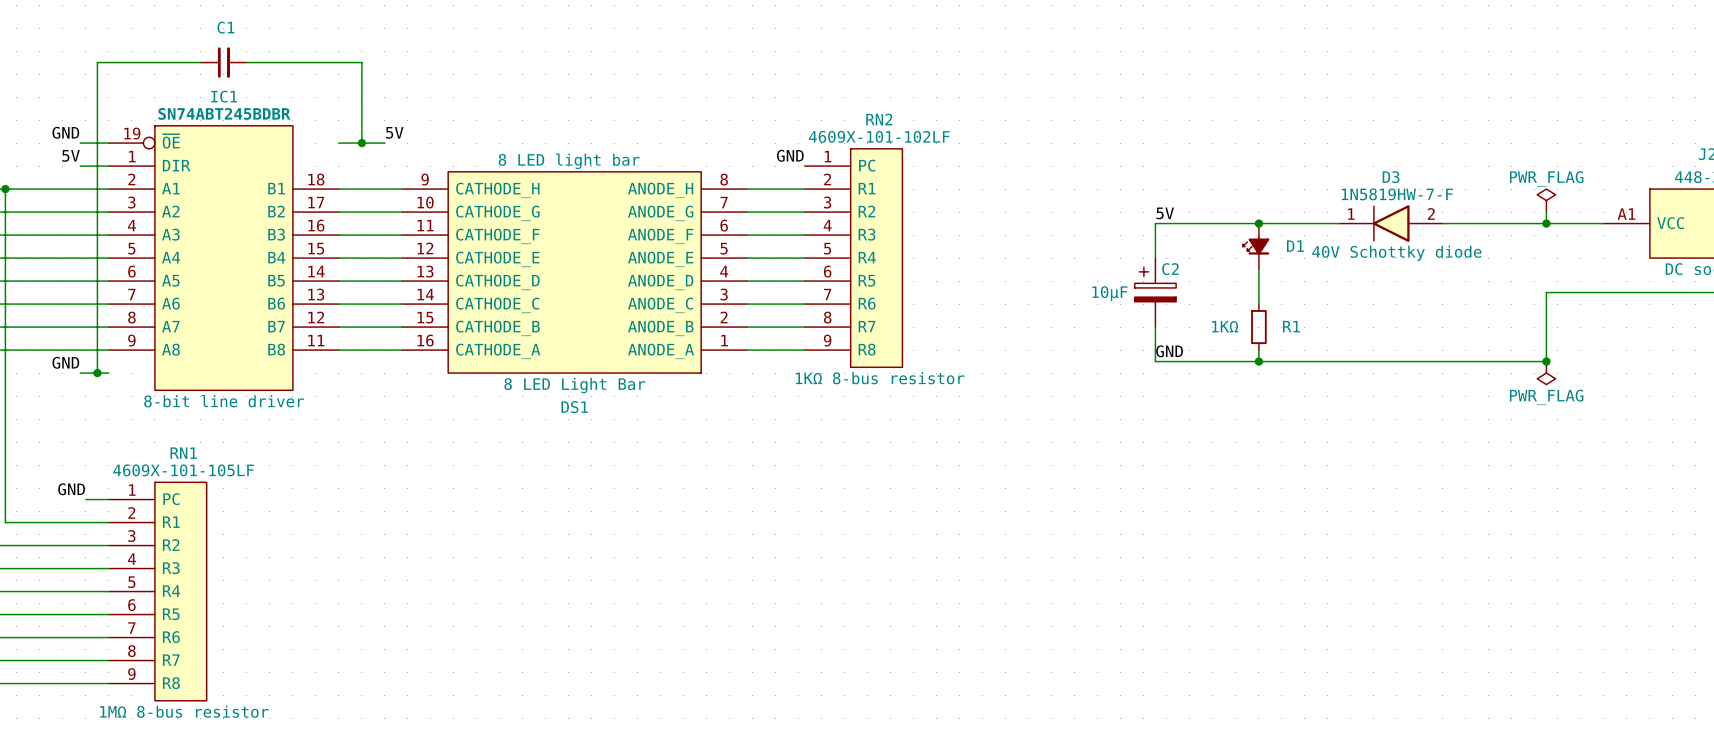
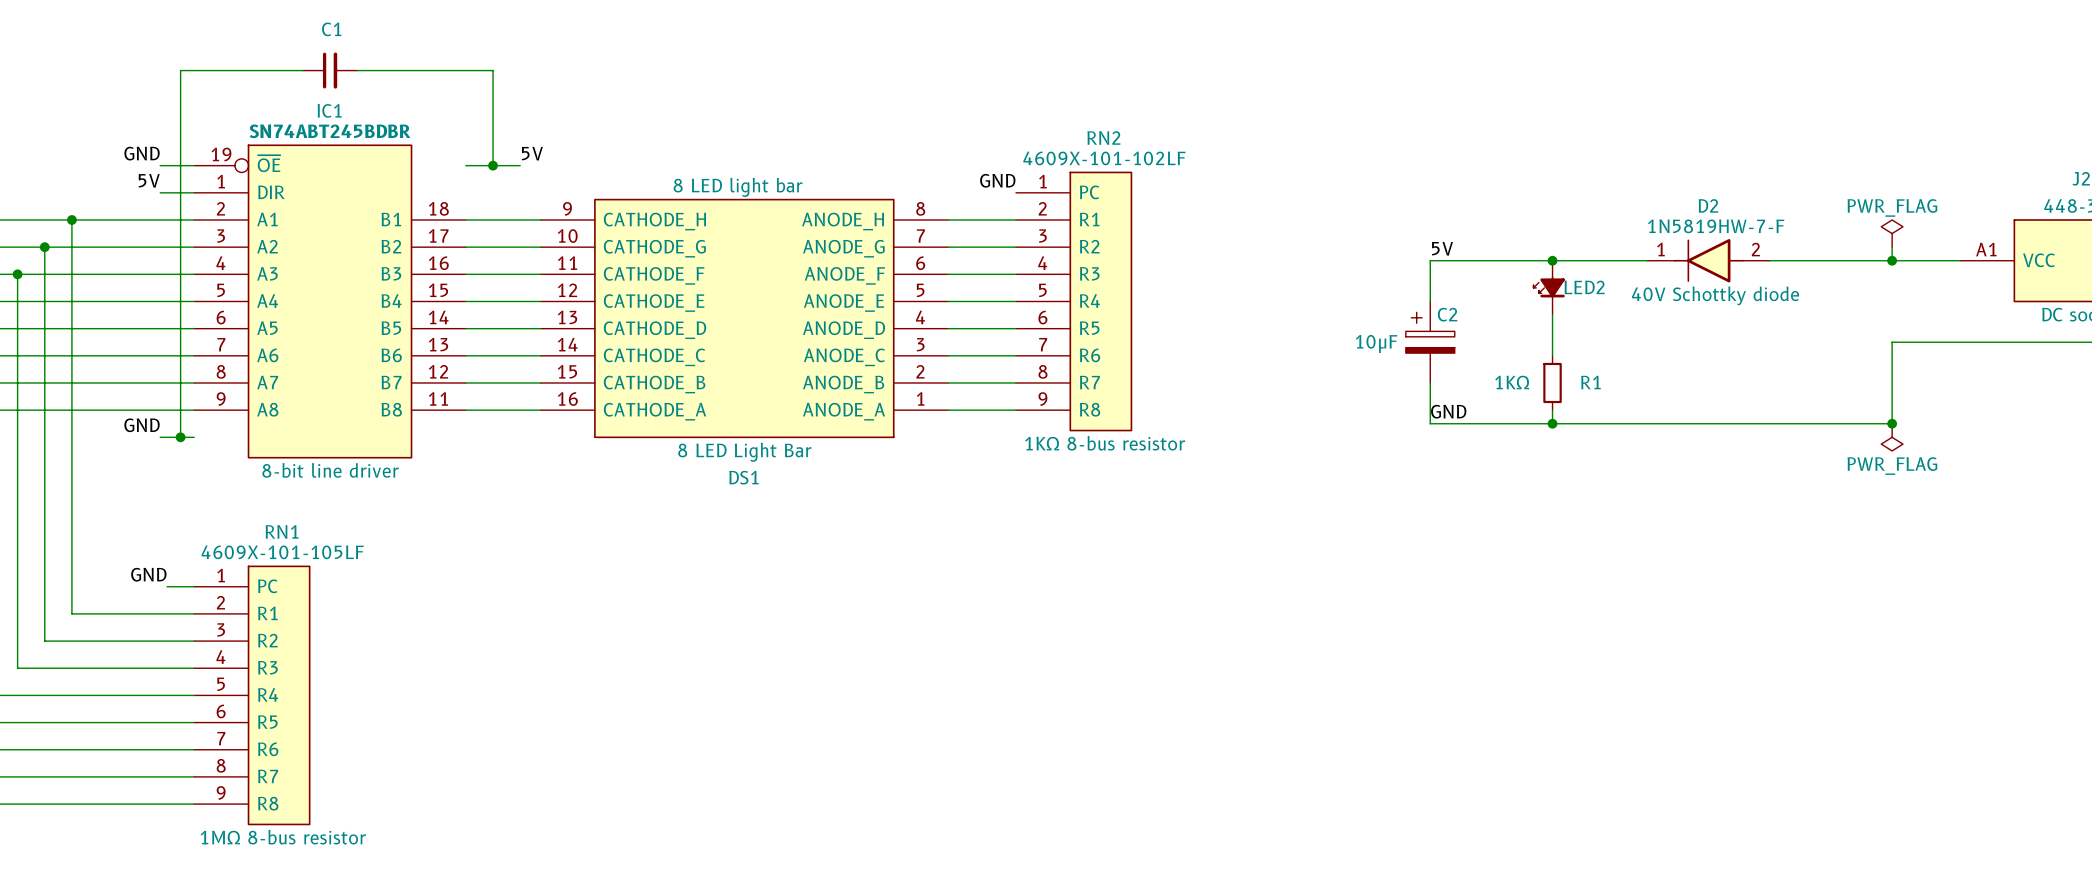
D3 name: D3 (1391, 177) -> D2 (1708, 205)
D1 name: D1 (1295, 246) -> LED2 (1584, 287)

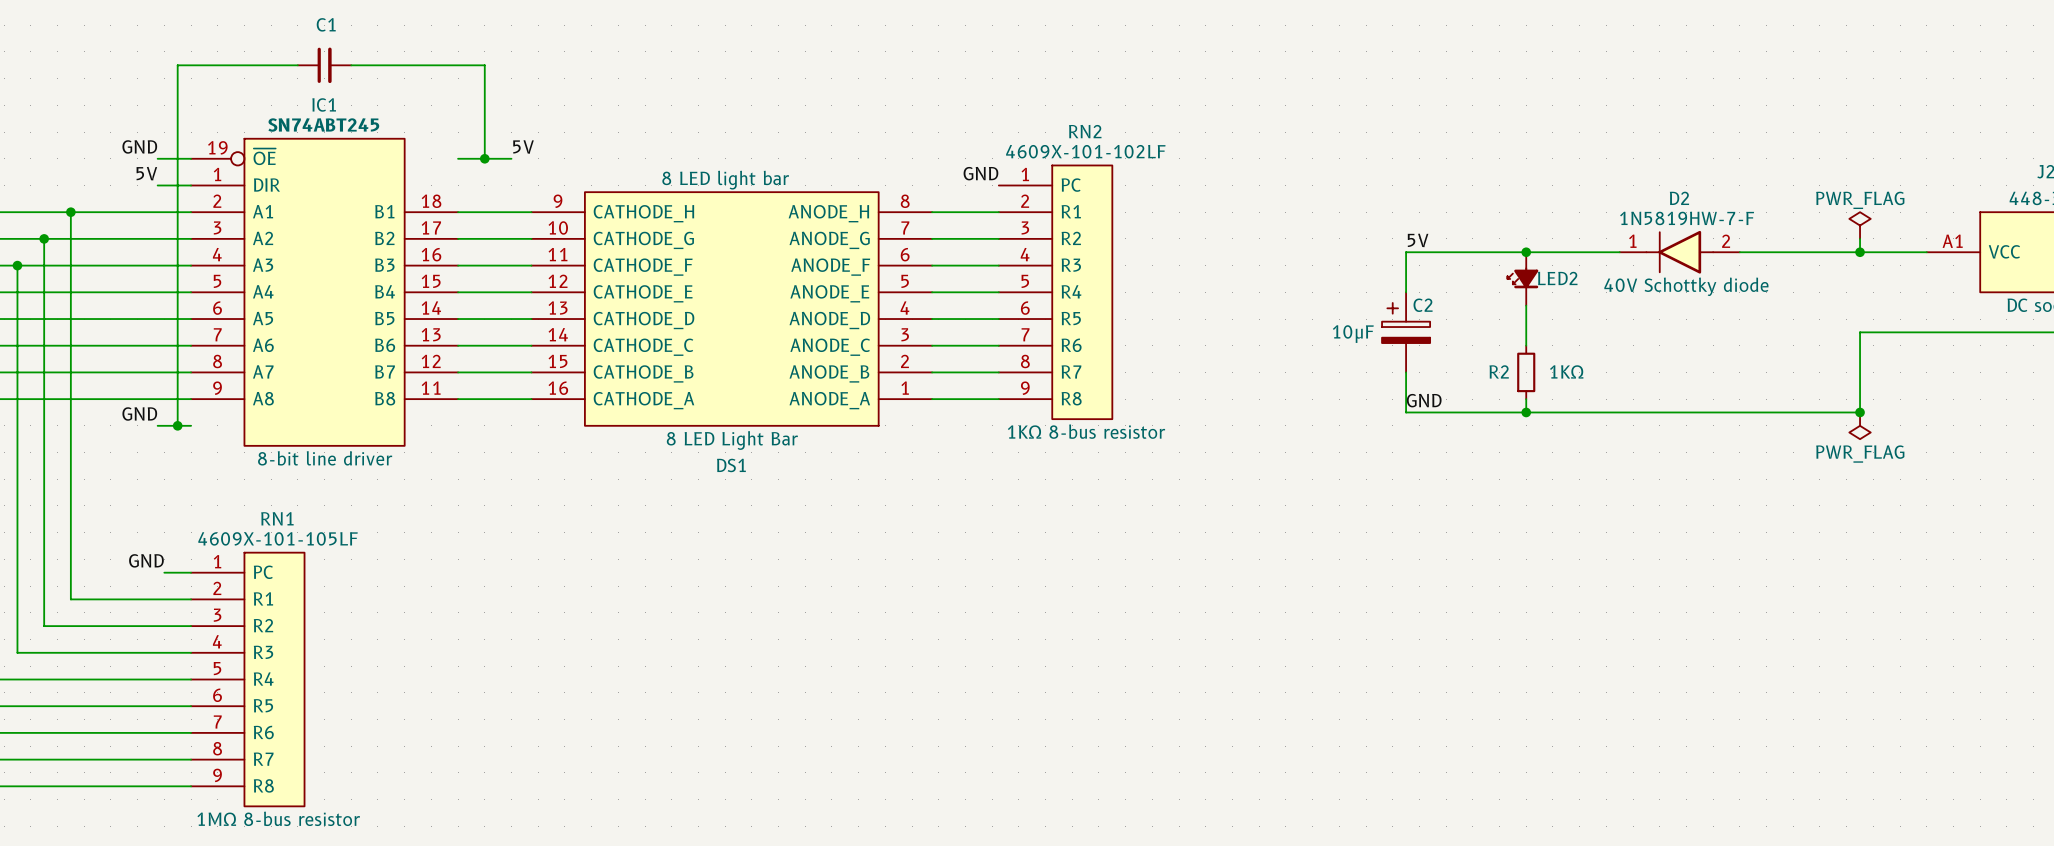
IC1 value: SN74ABT245BDBR (330, 131) -> SN74ABT245 (323, 124)
R1: (1552, 382) -> none
R2: none -> (1526, 372)

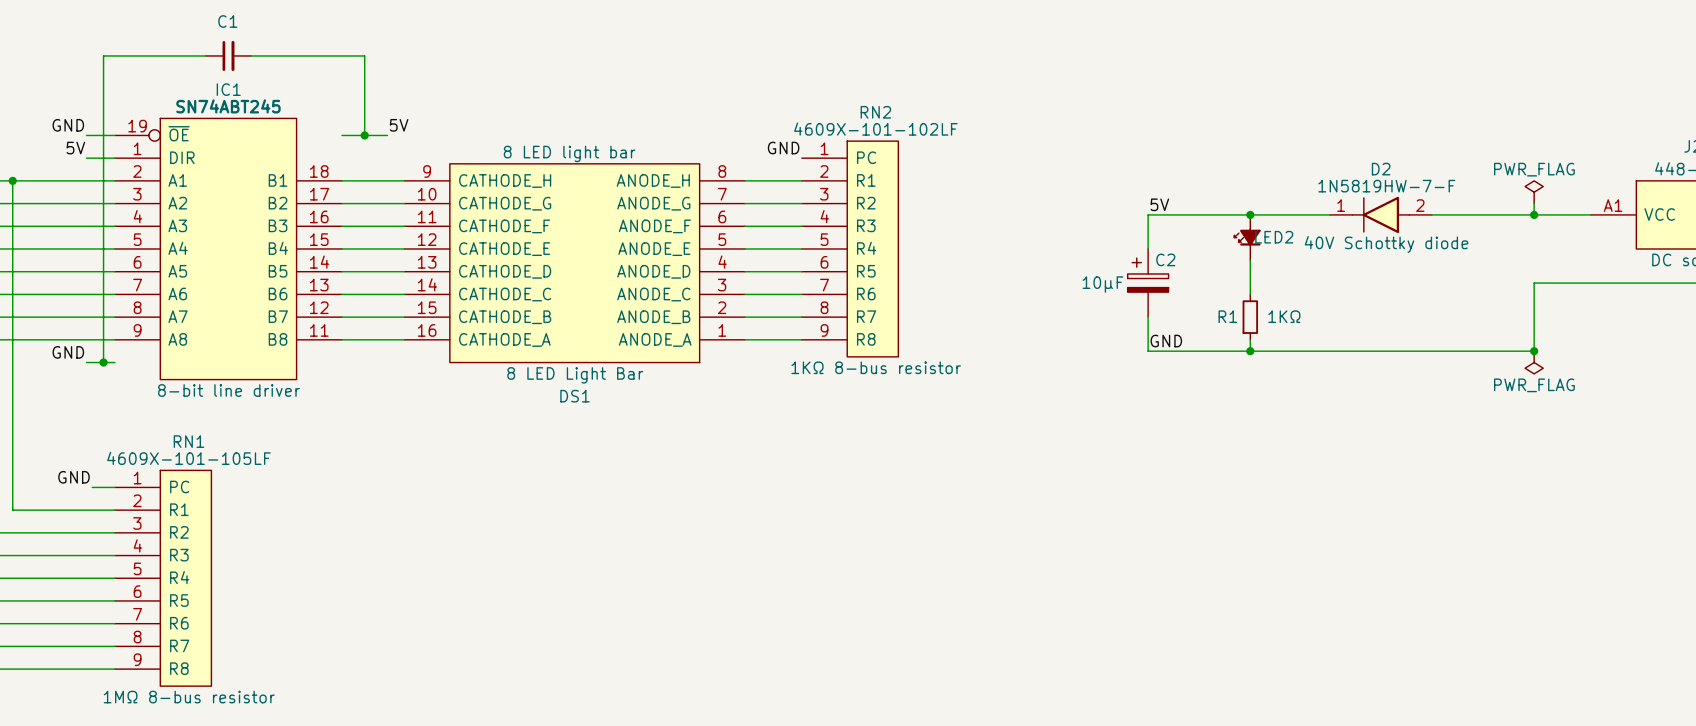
R2 name: R2 (1499, 371) -> R1 (1227, 316)

